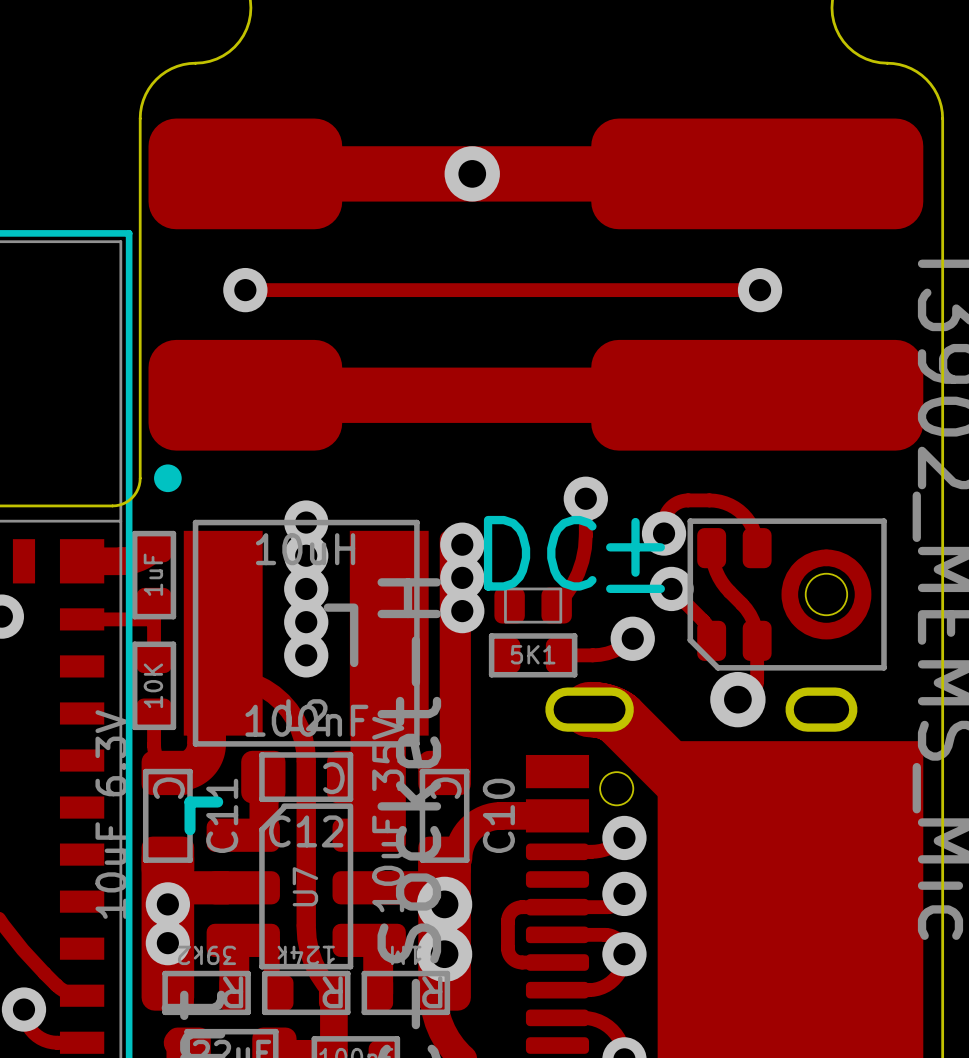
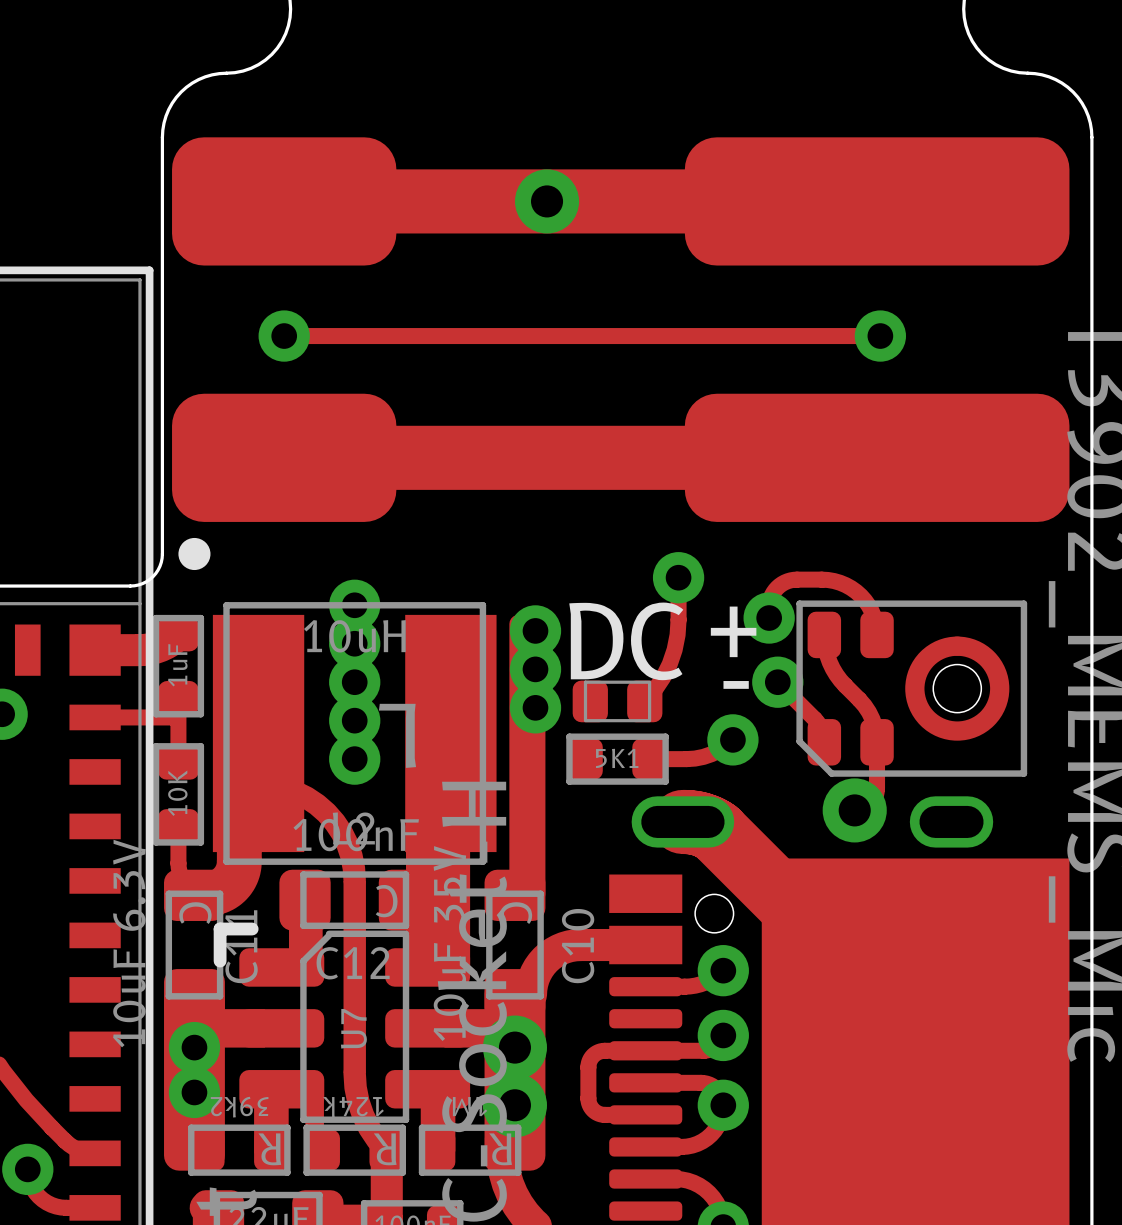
C11 name position: C11 (222, 815) -> C11 (241, 946)

